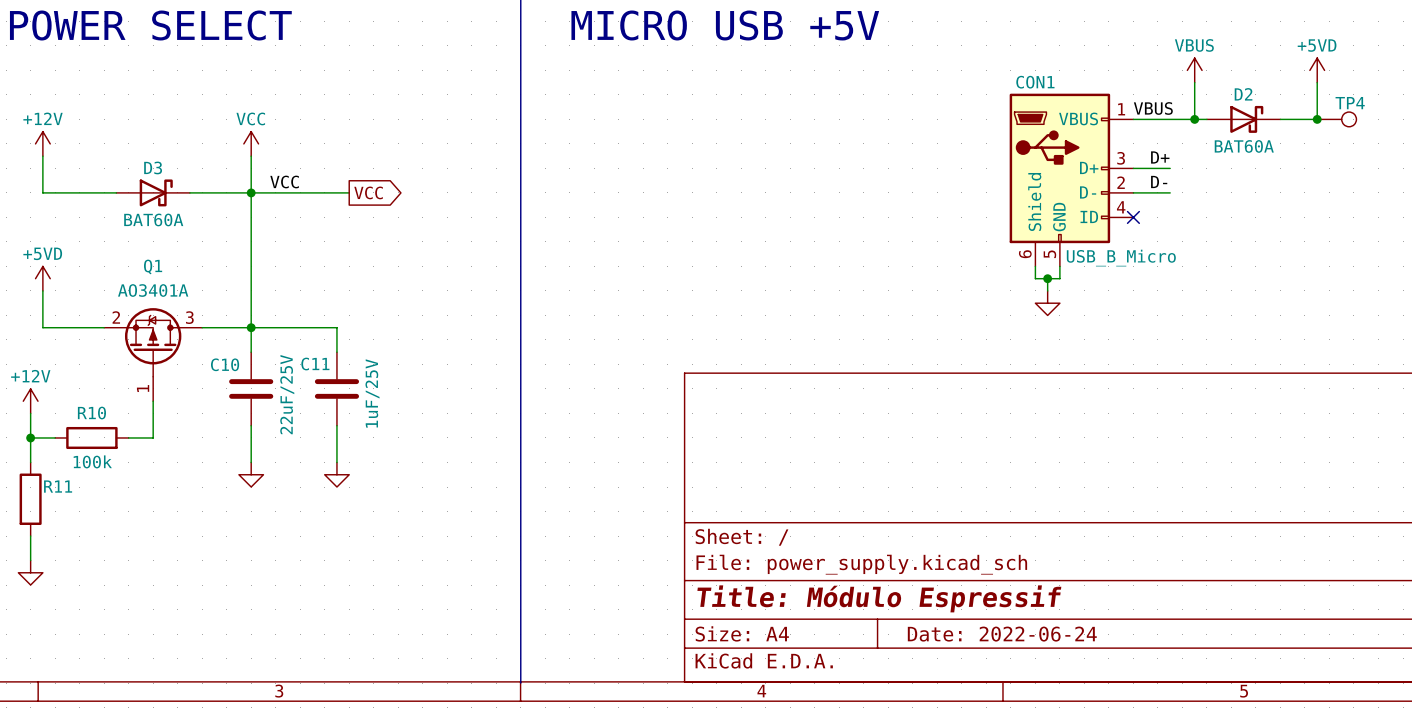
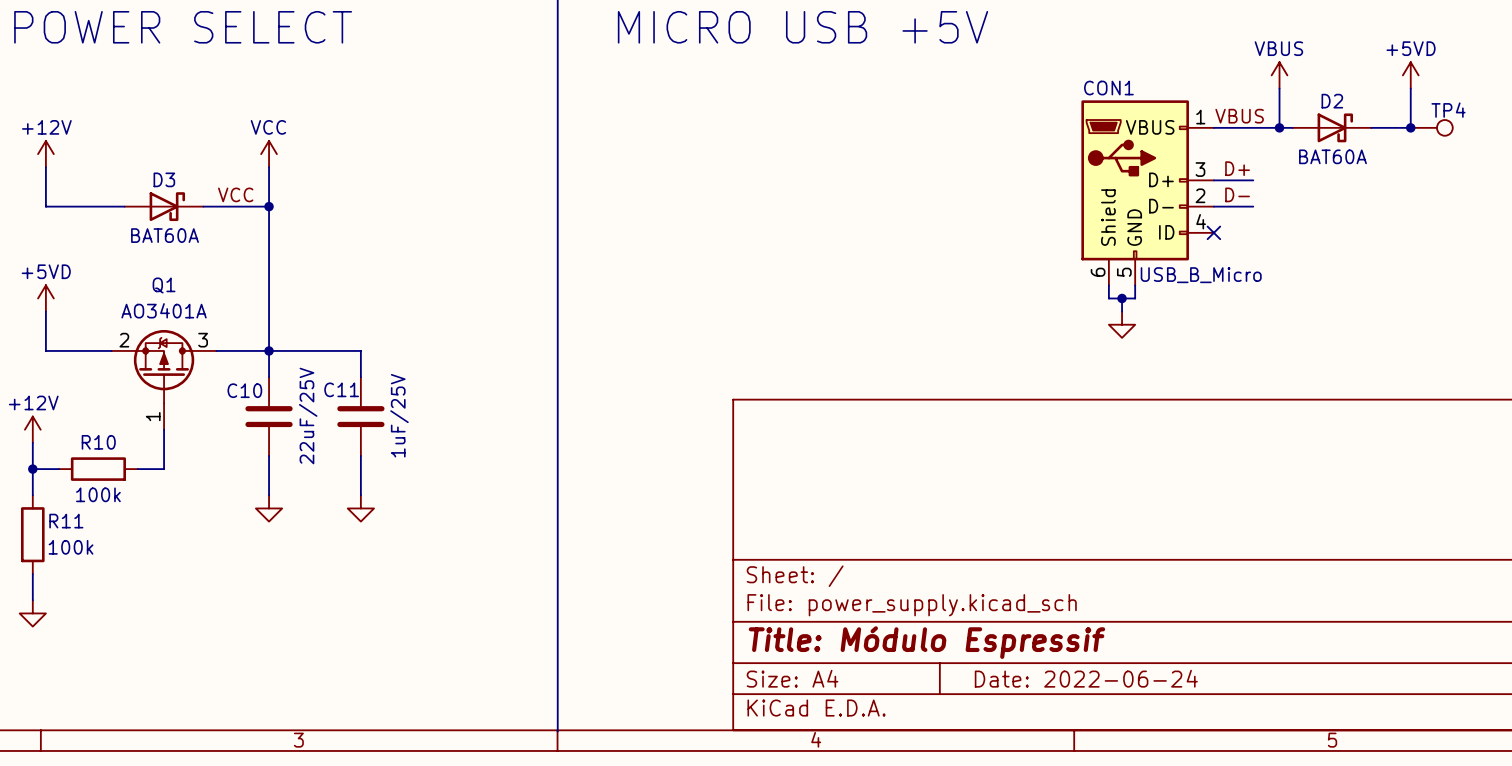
label position: VCC (284, 182) -> VCC (235, 194)
wire: (251, 192) (349, 192) -> none
global label: VCC (368, 192) -> none
R11 value: none -> 100k (71, 547)

